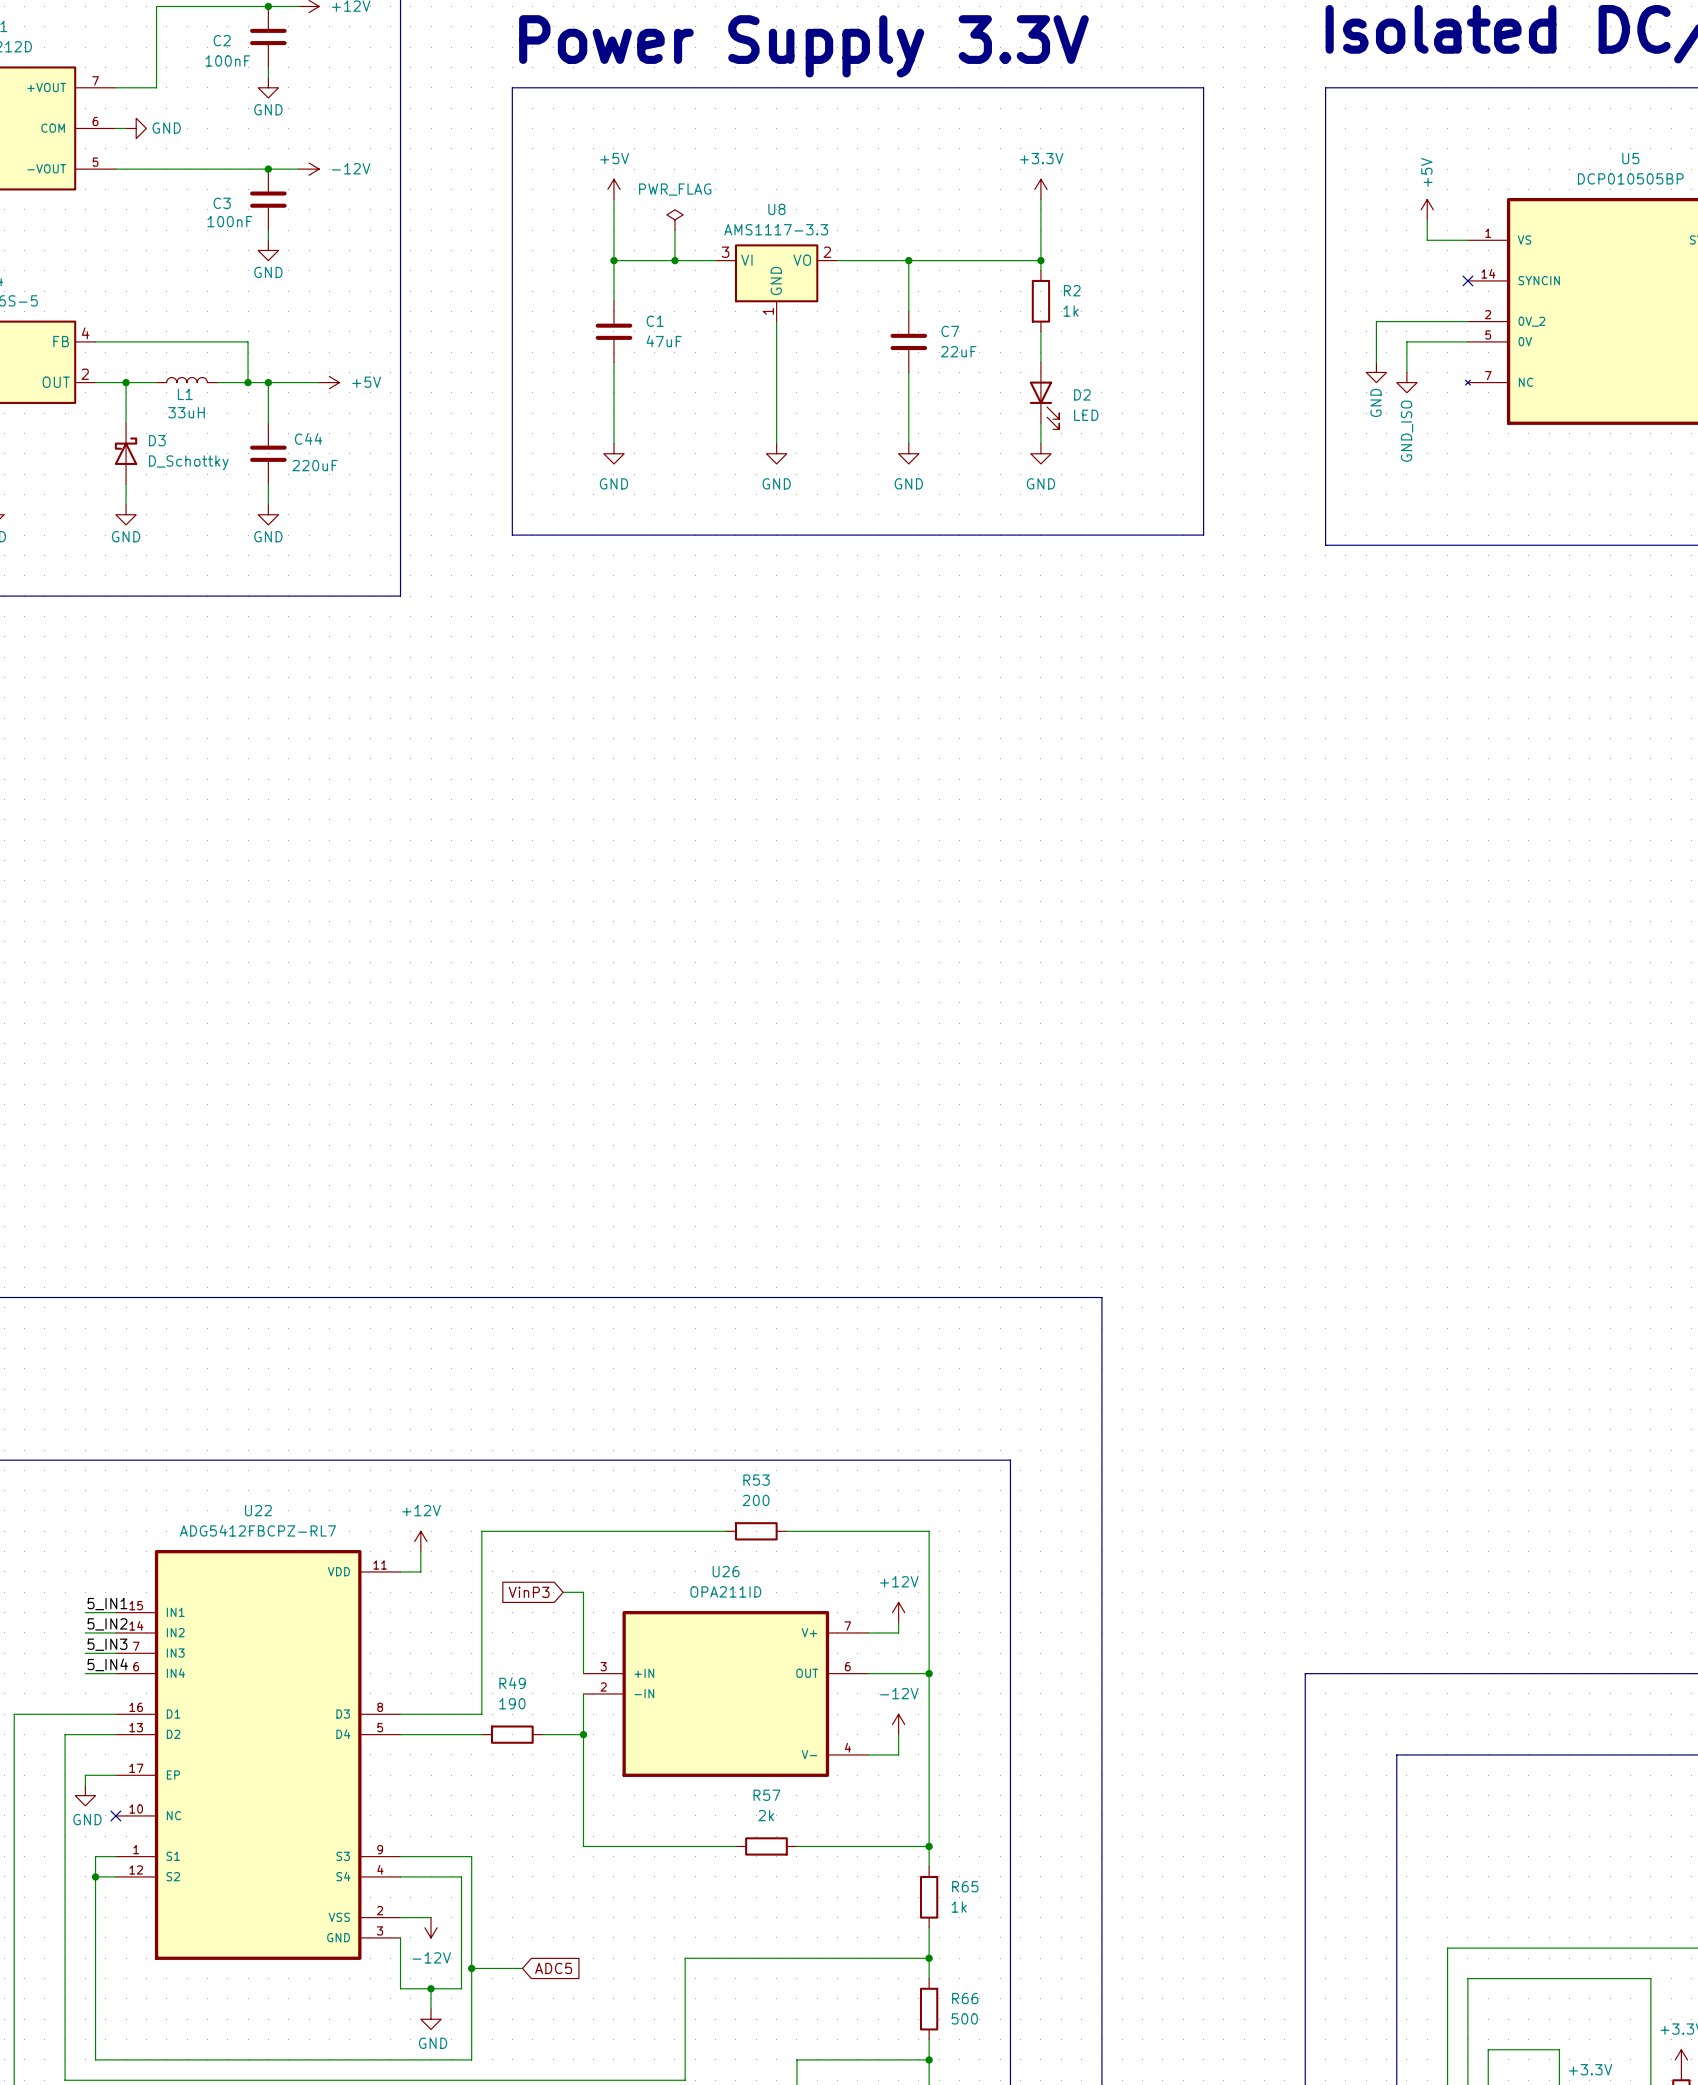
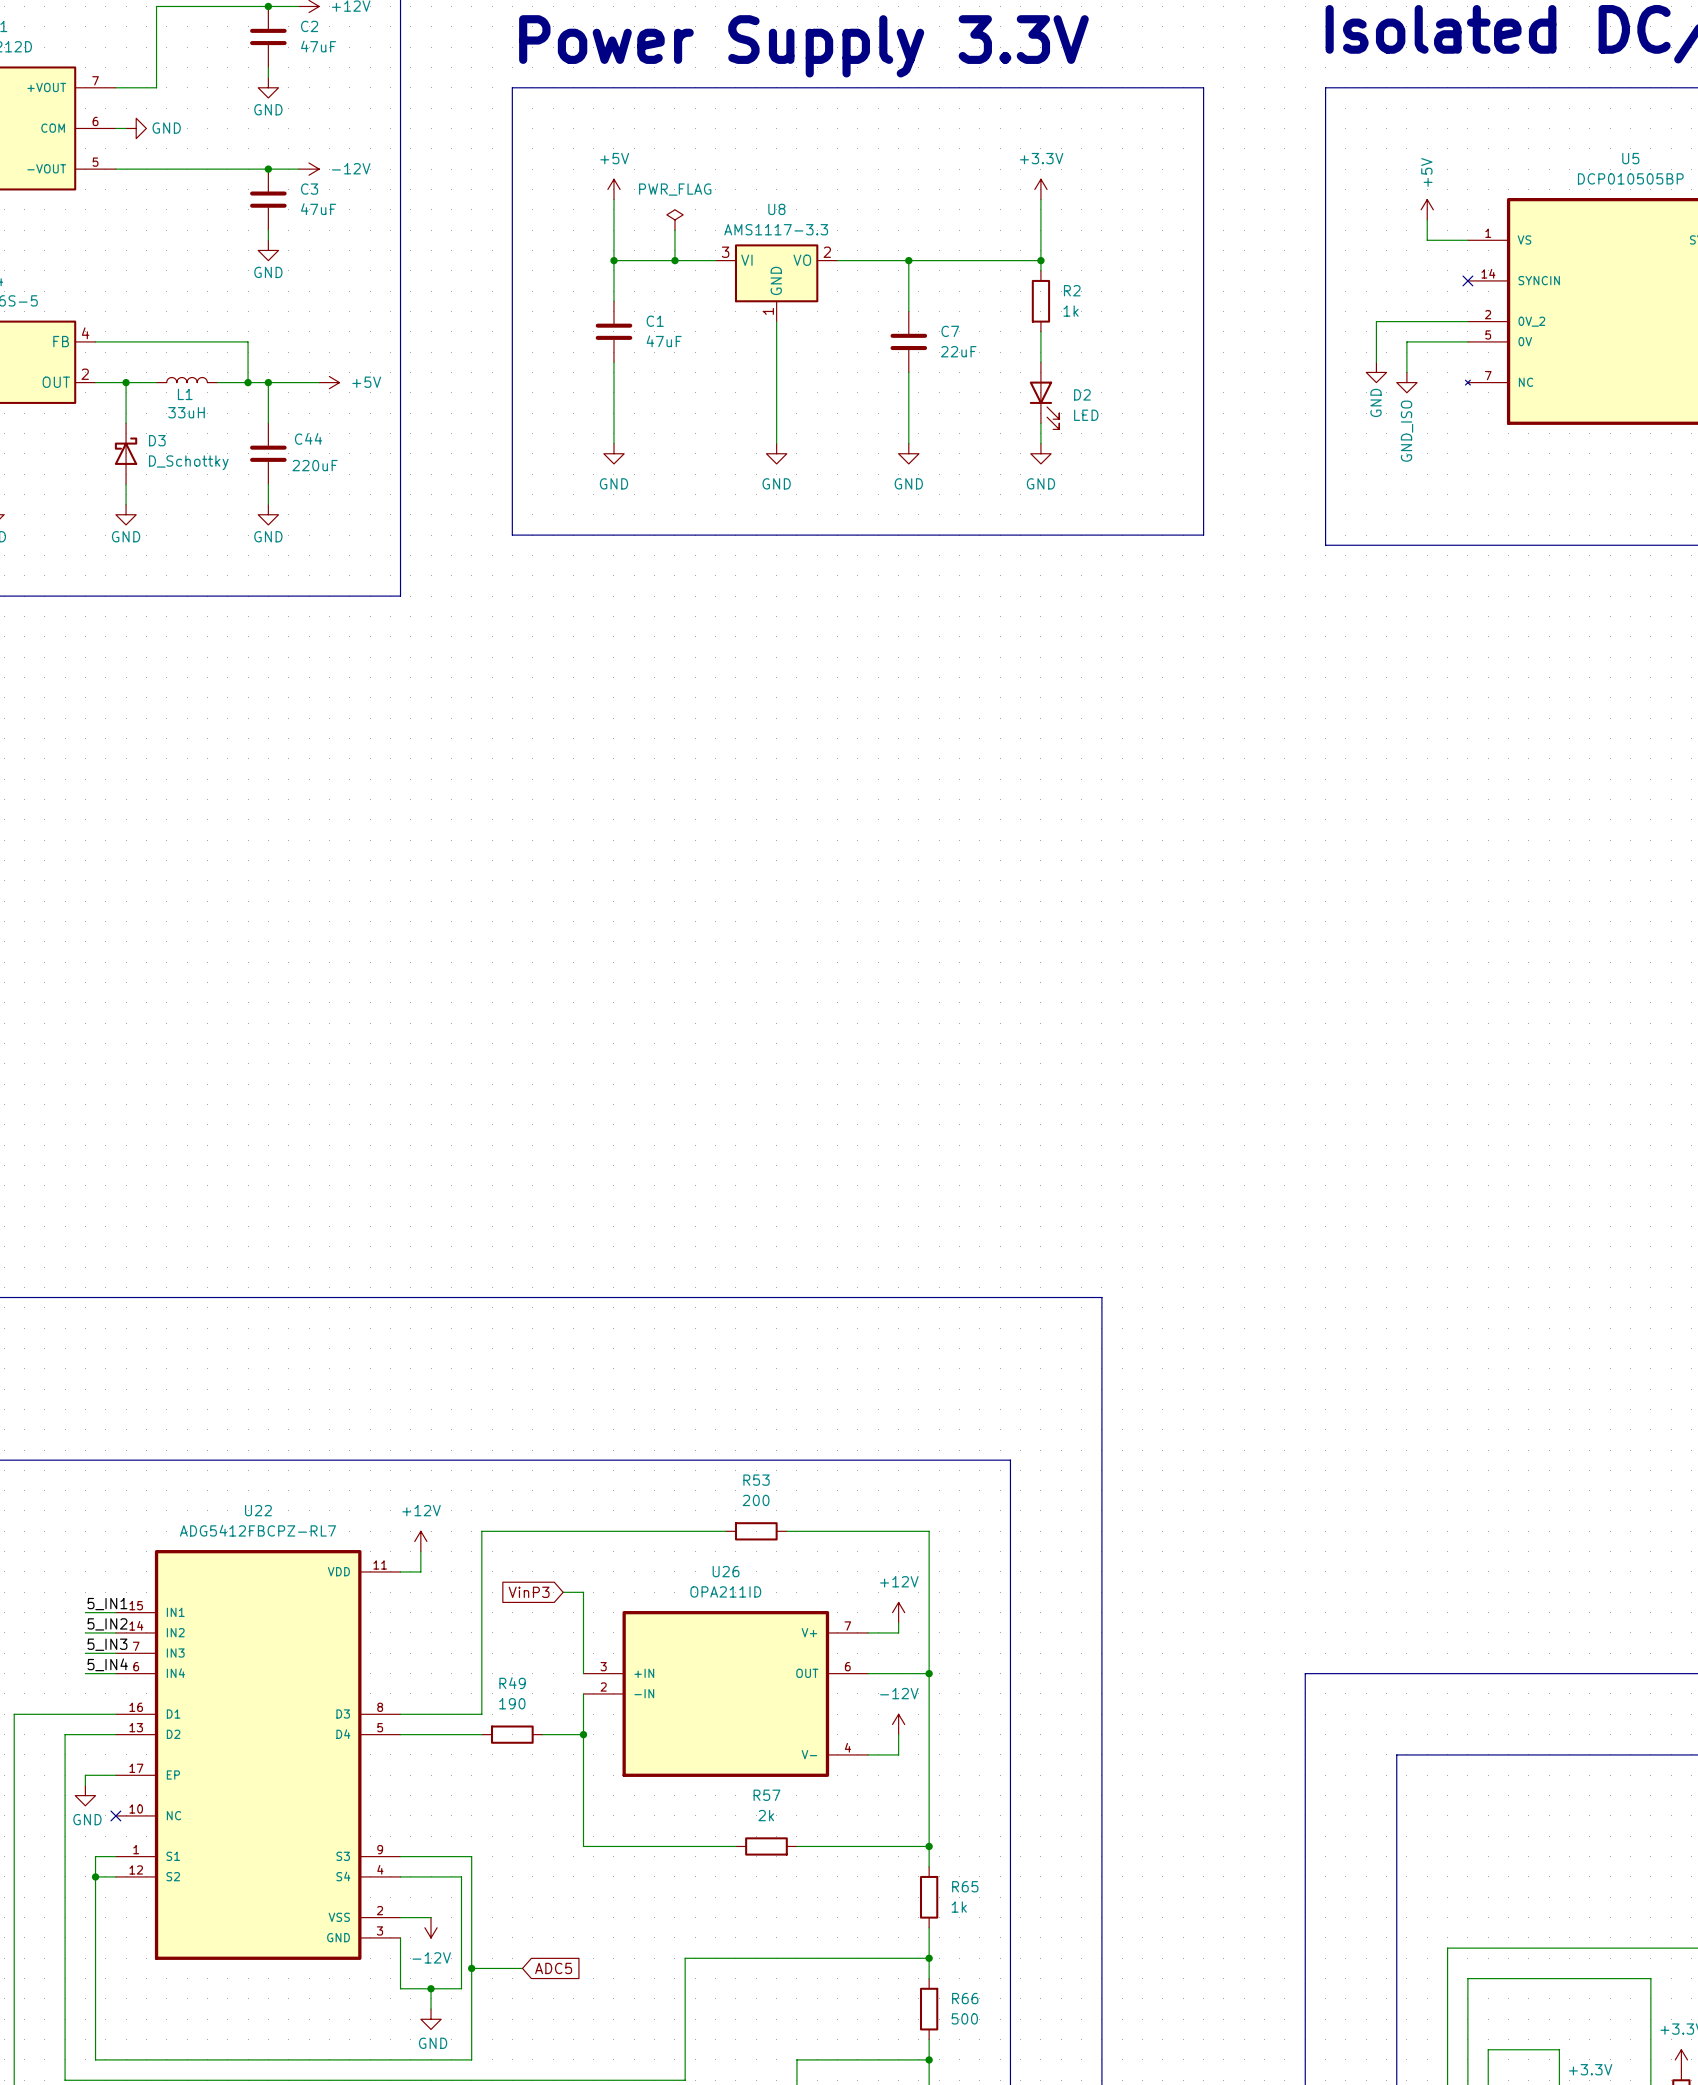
C2 name position: C2 (222, 40) -> C2 (309, 26)
C2 value: 100nF (227, 60) -> 47uF (318, 46)
C3 name position: C3 (222, 203) -> C3 (309, 189)
C3 value: 100nF (229, 221) -> 47uF (318, 209)

